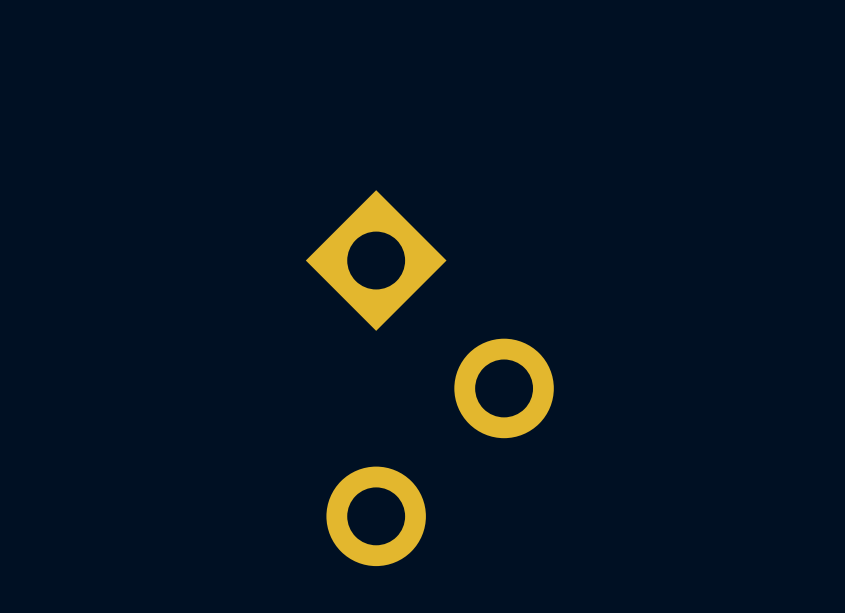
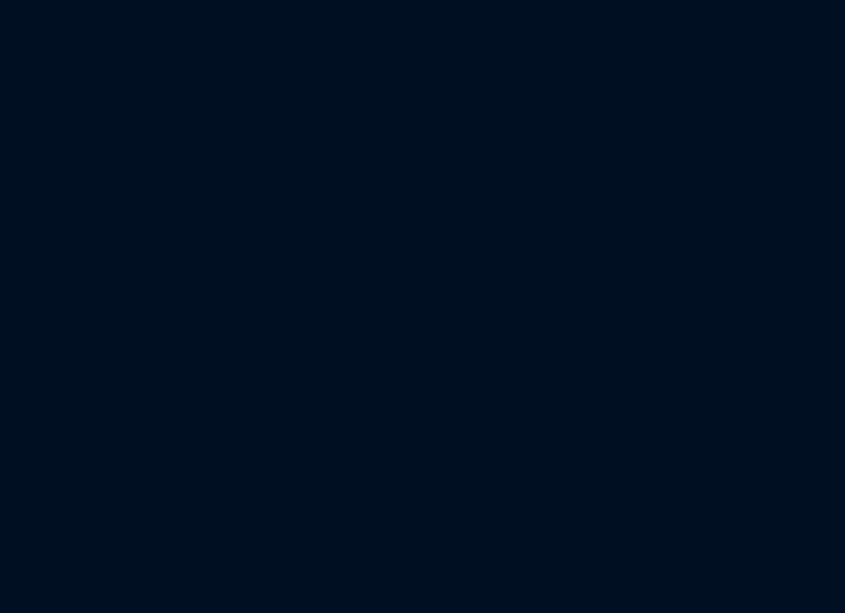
part: (429, 378) -> none

